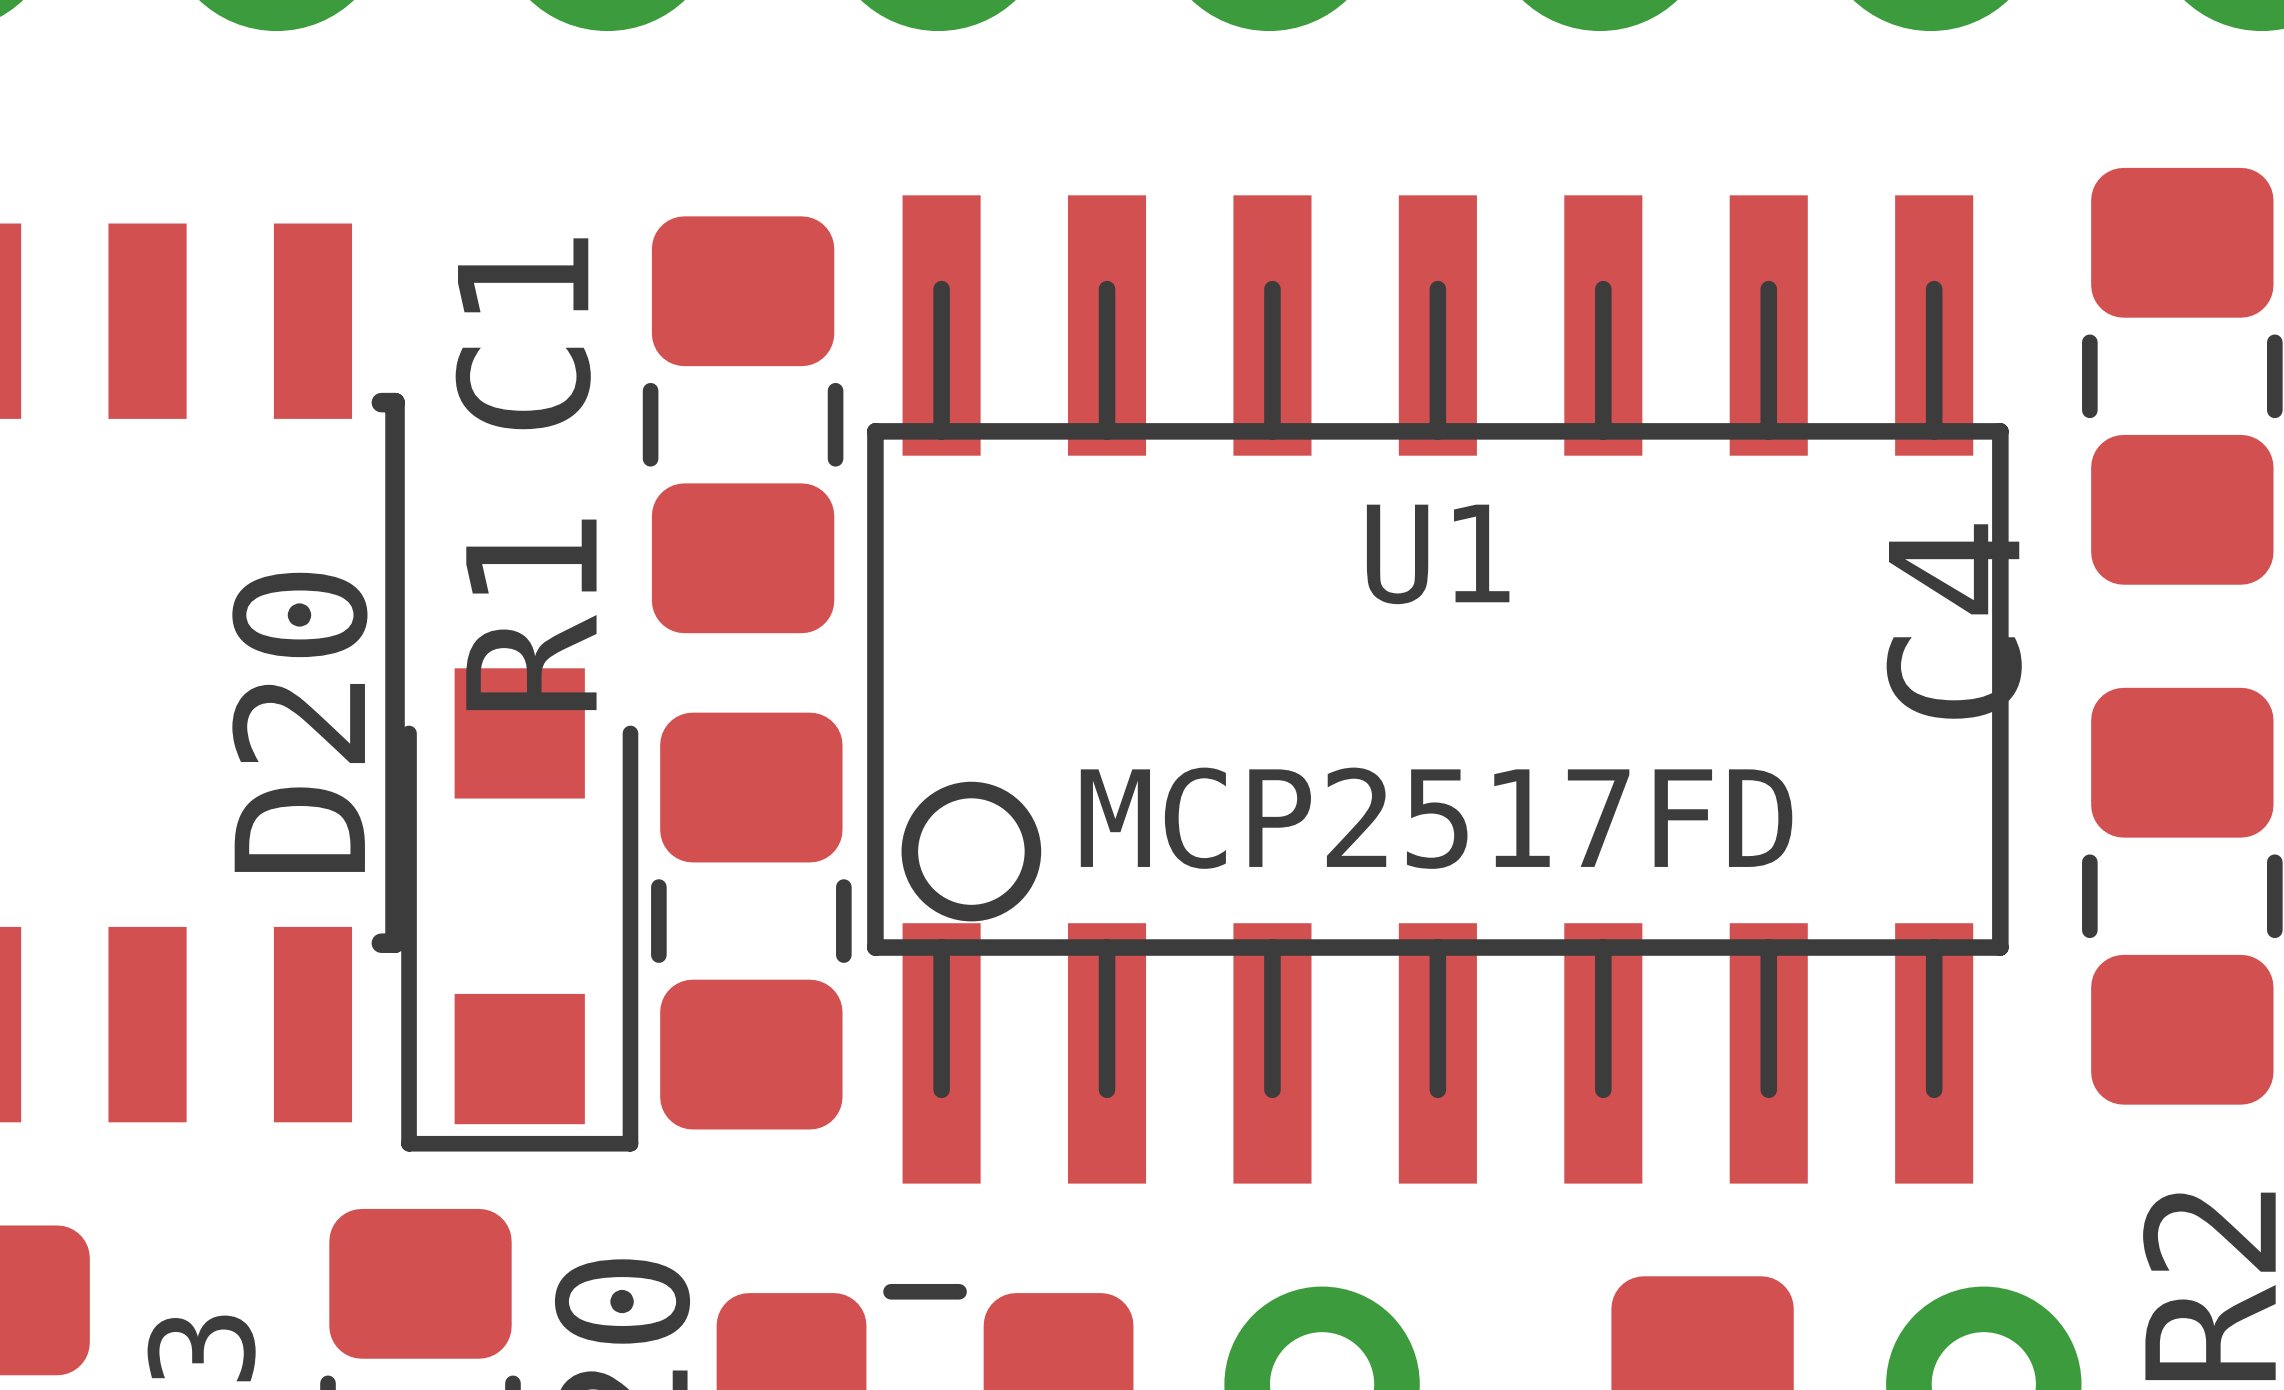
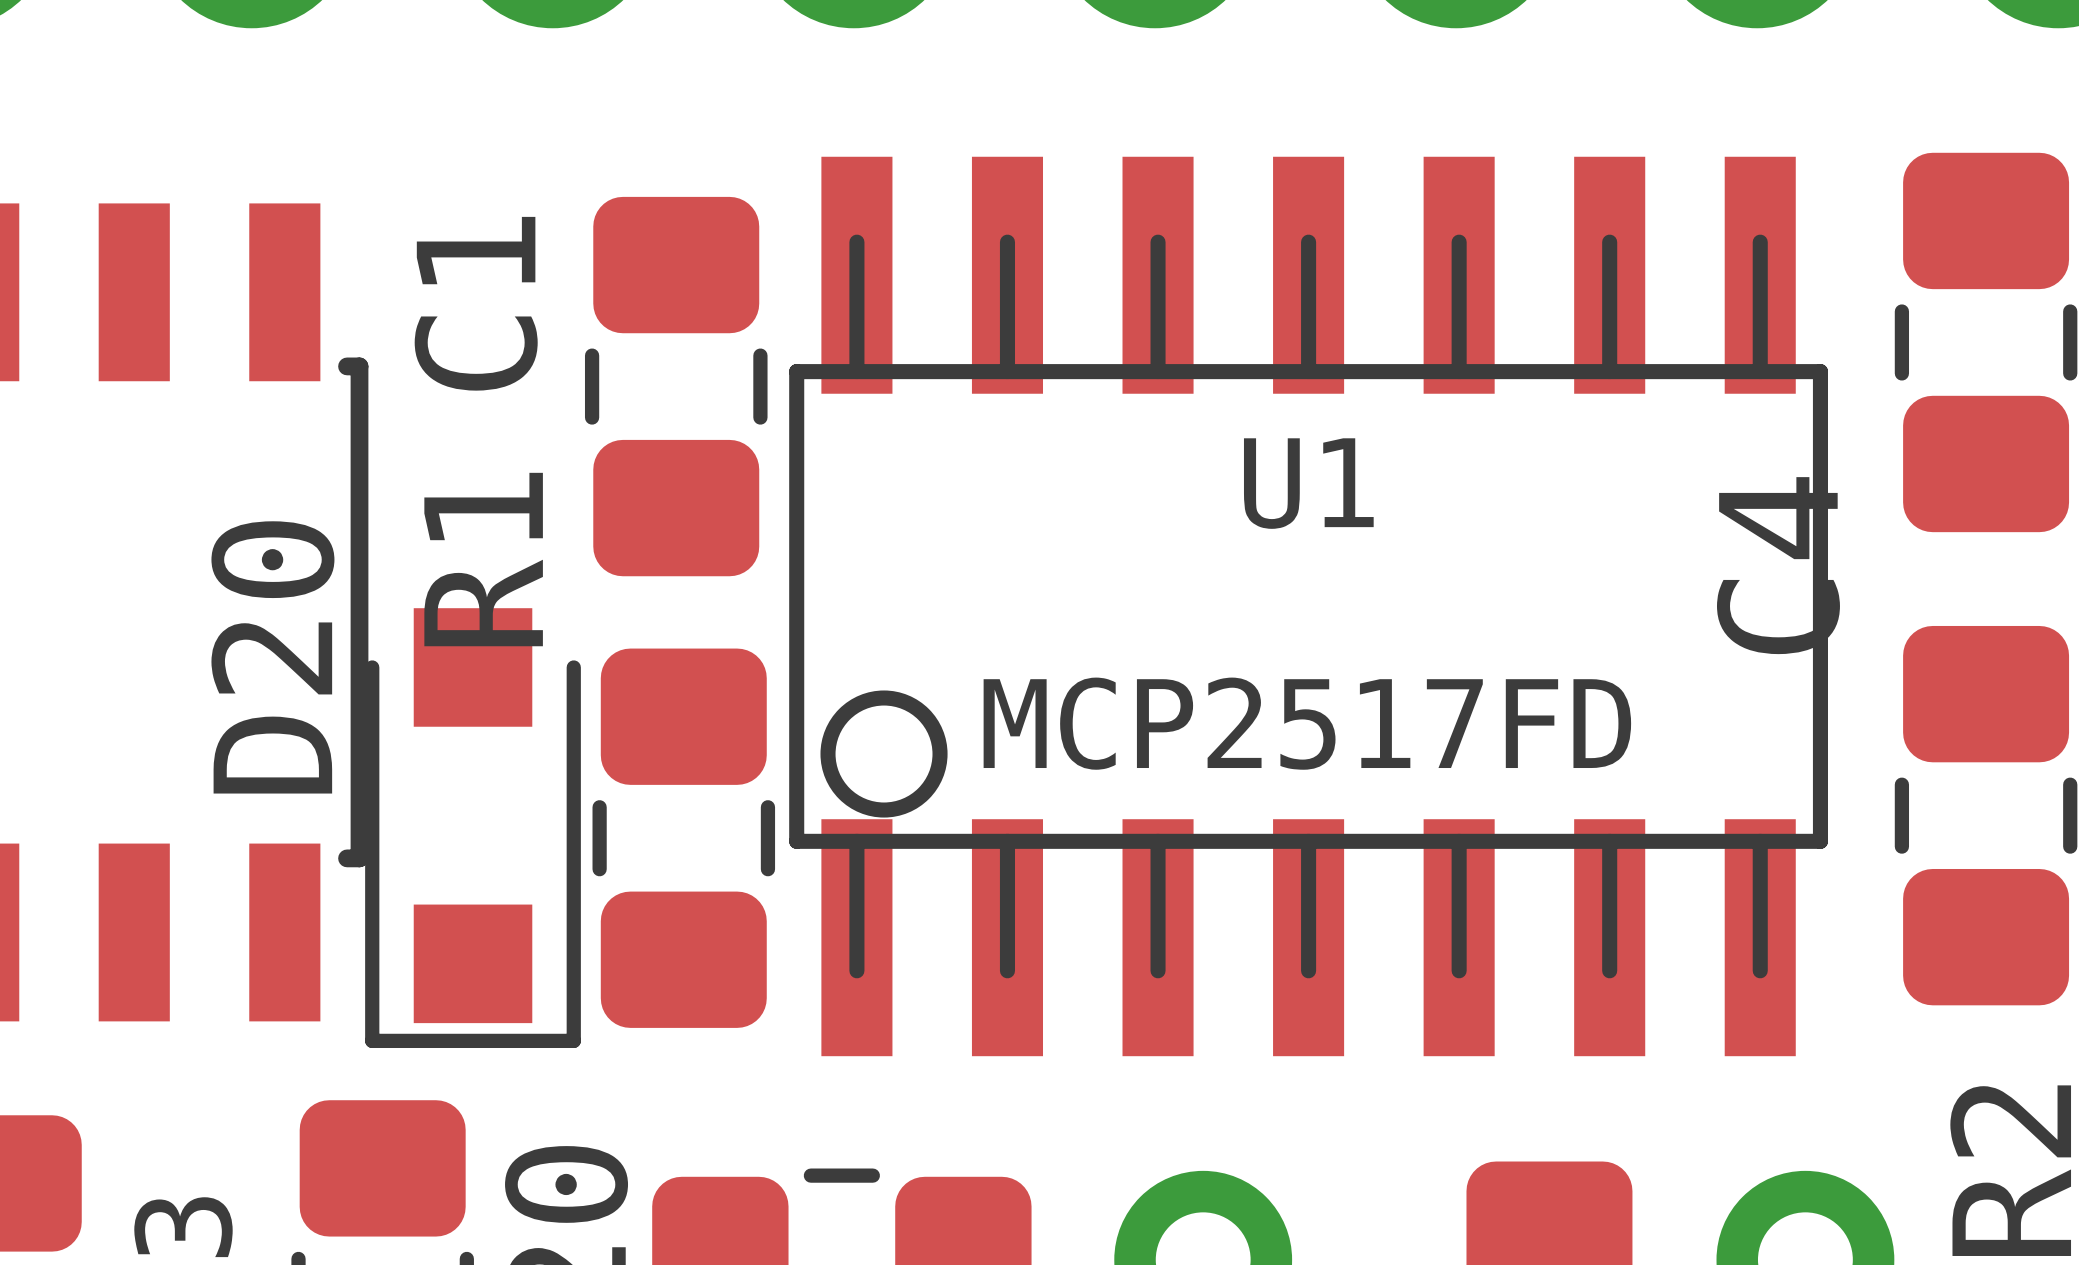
U1 position: (1437, 689) -> (1308, 606)

